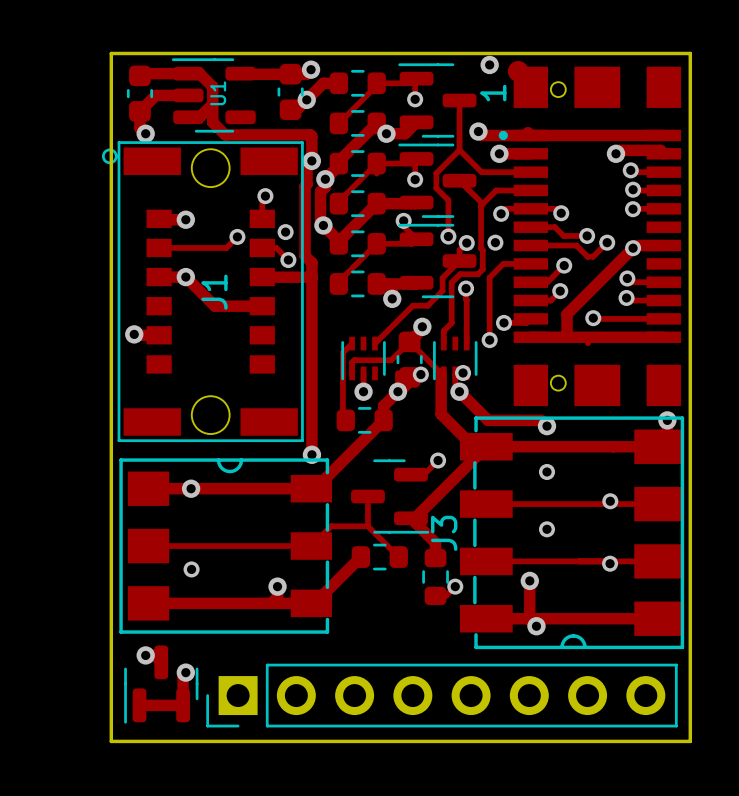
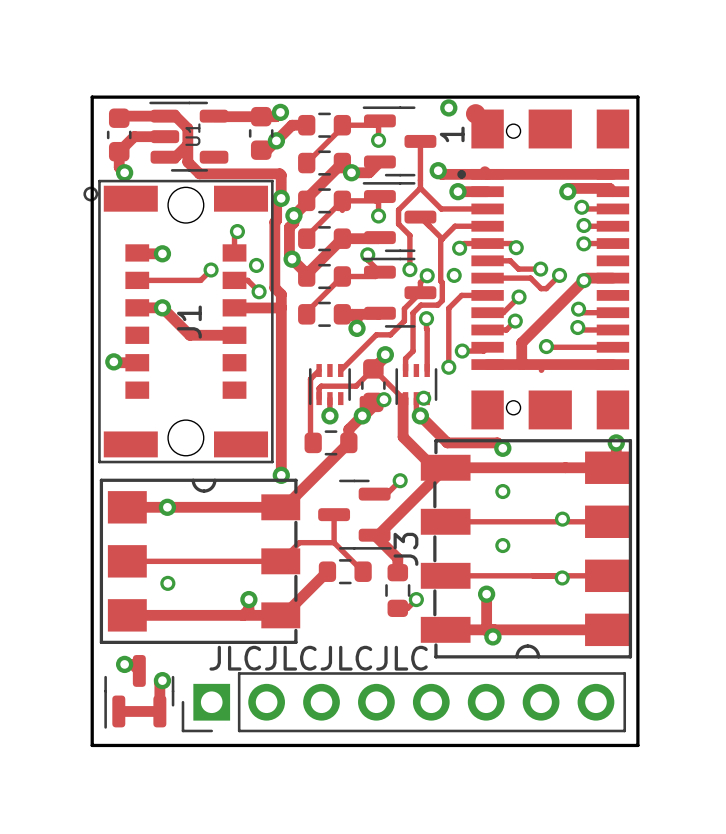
text: none -> JLCJLCJLCJLC (318, 658)

